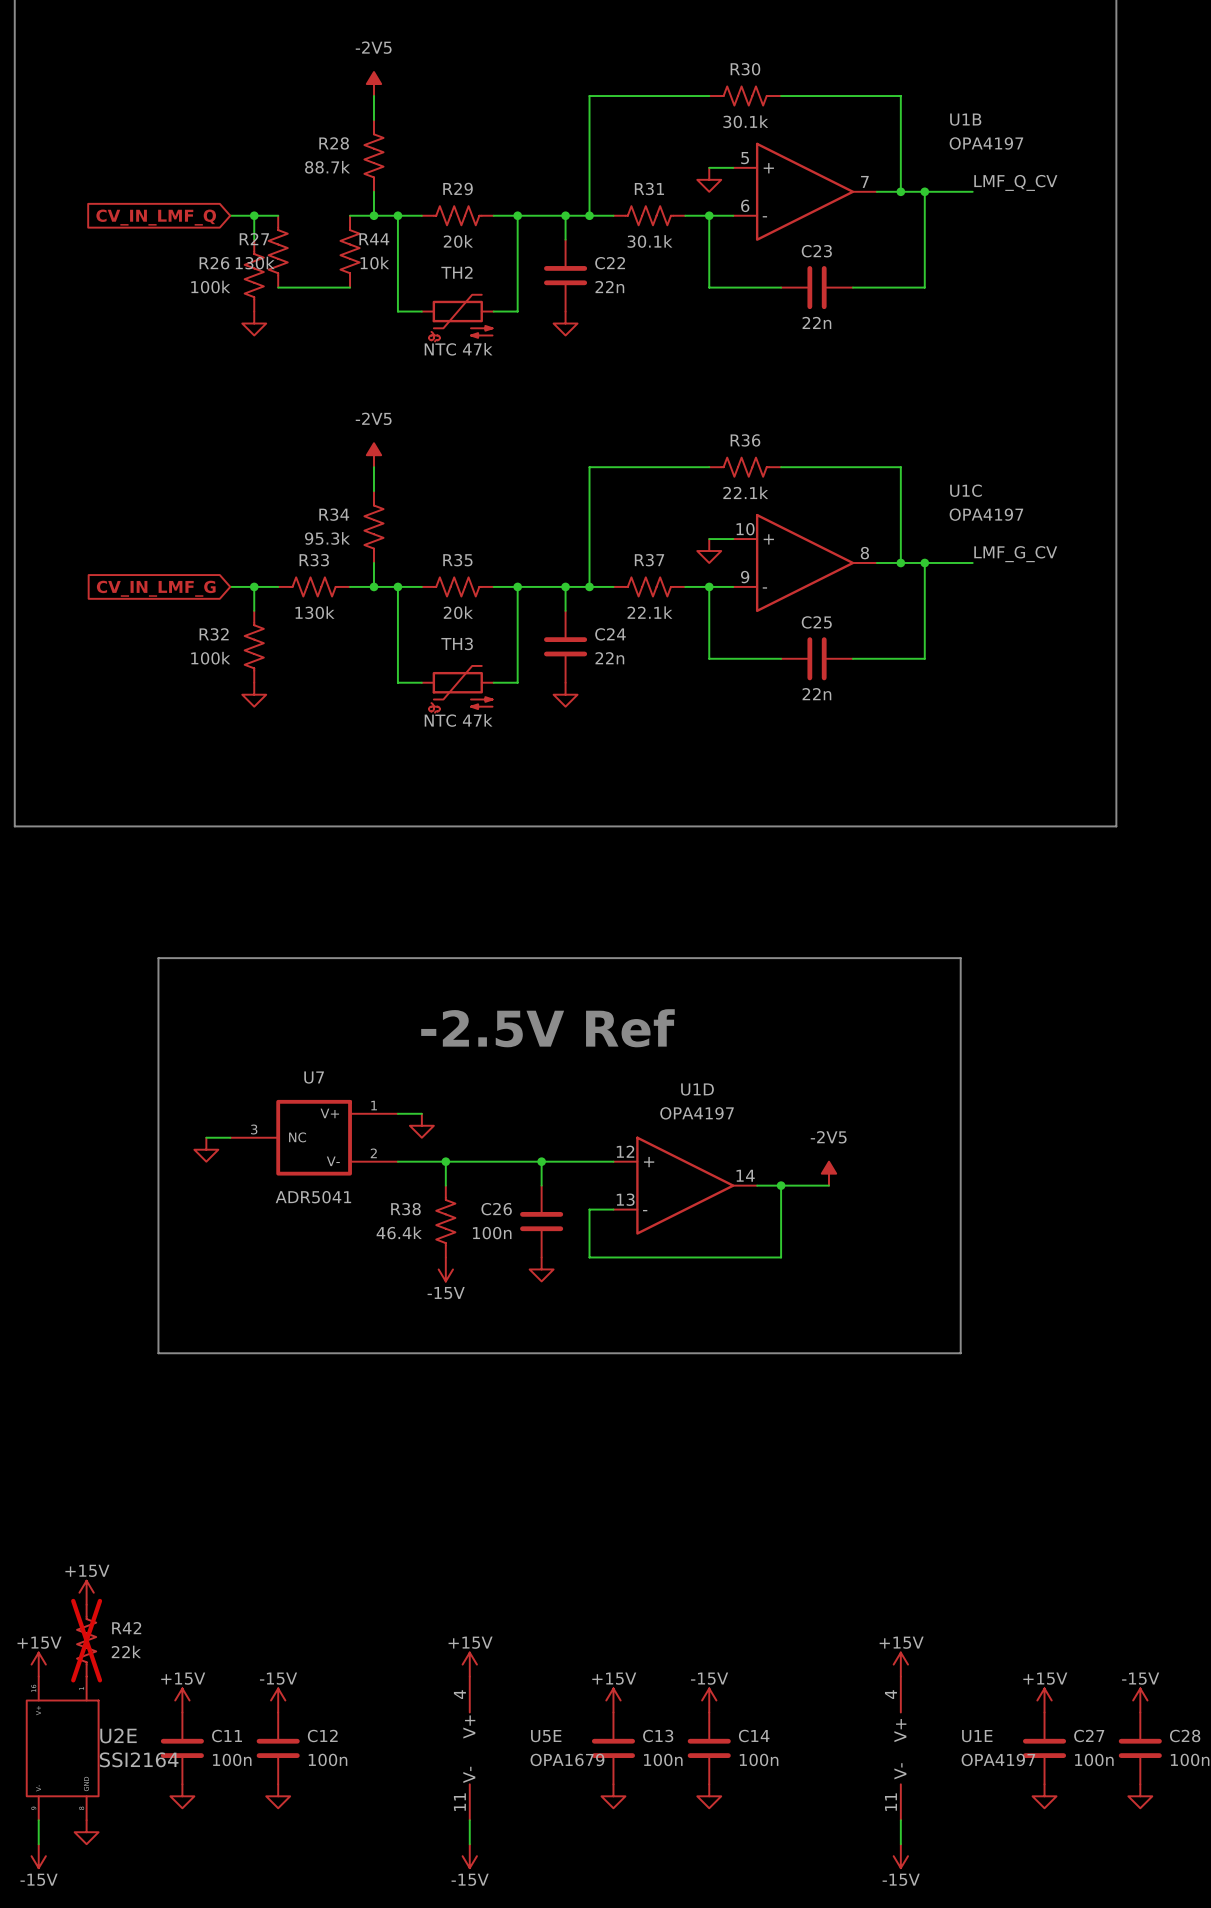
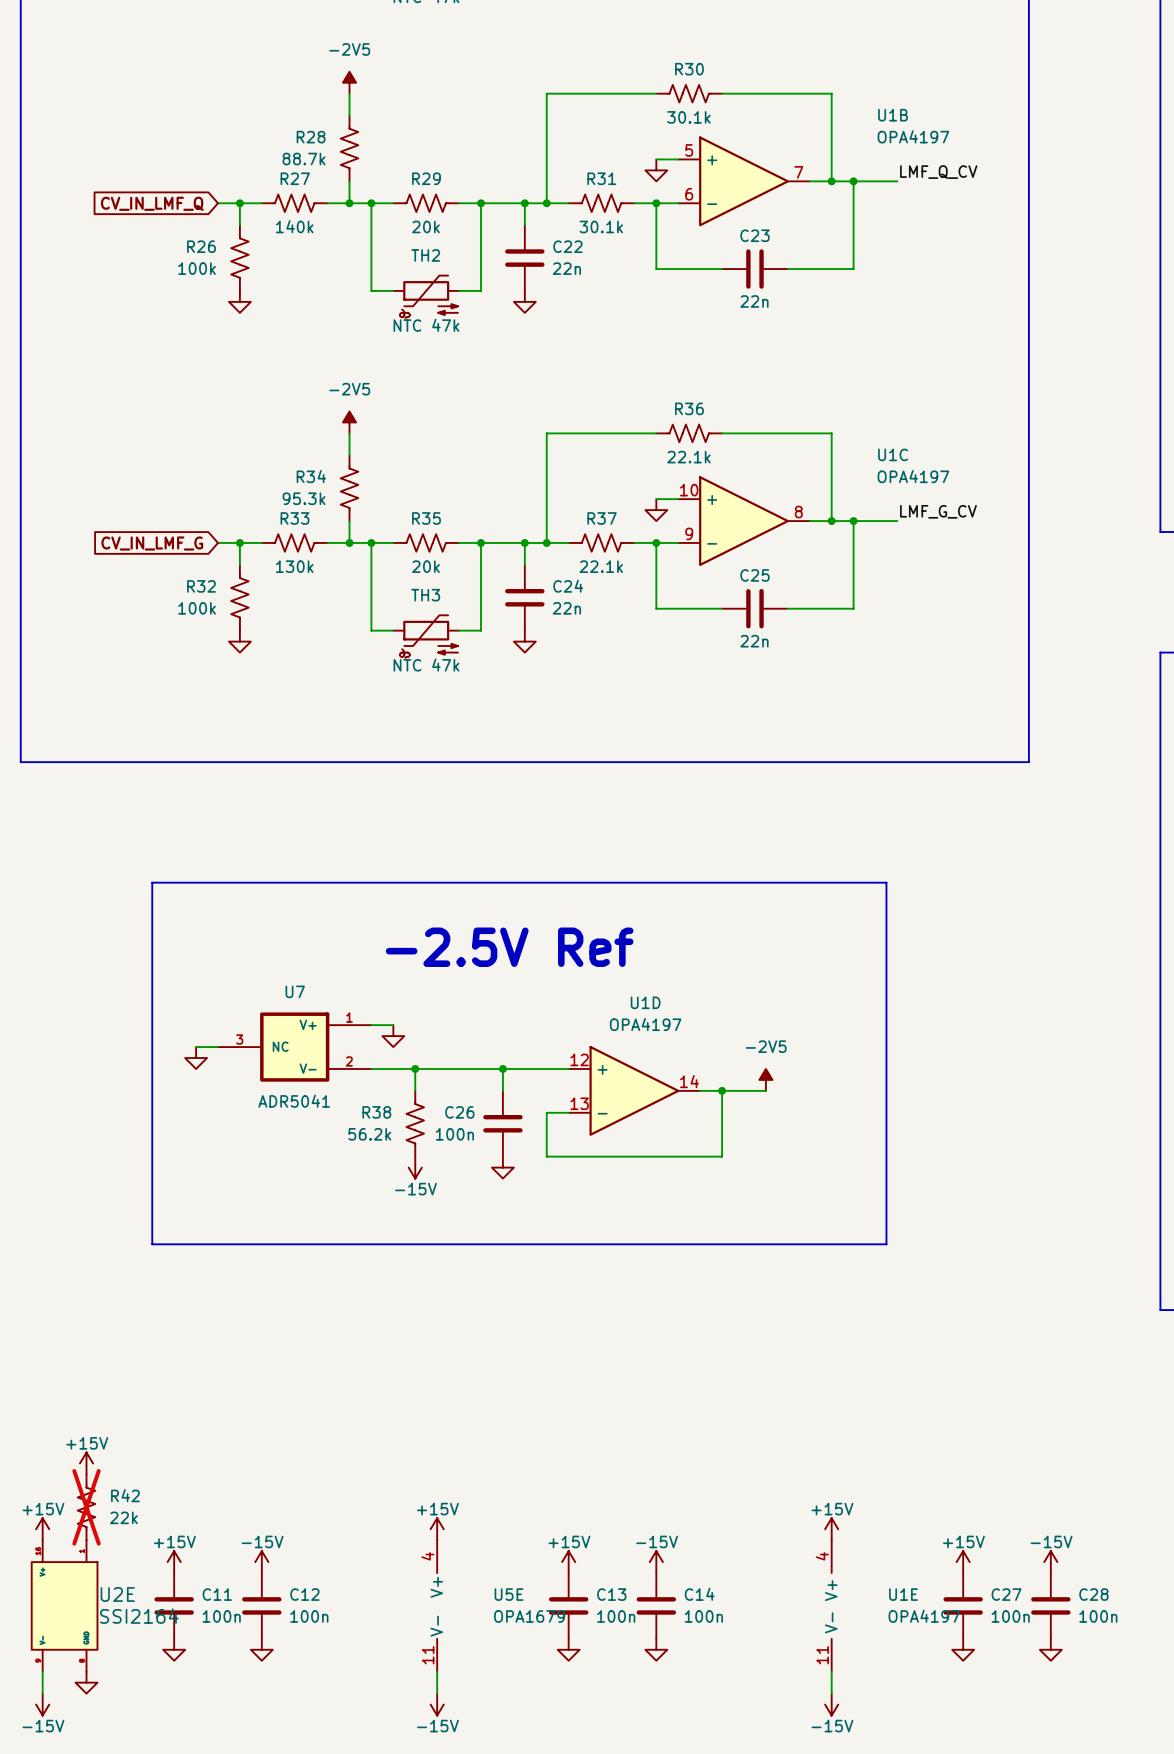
R27 rotation: 0° (278, 251) -> 90° clockwise (294, 203)
R27 position: (278, 251) -> (294, 203)
R44: 10k (350, 251) -> none
R27 value: 130k (255, 263) -> 140k (294, 226)
wire: (278, 287) (350, 287) -> none
R38 value: 46.4k (399, 1232) -> 56.2k (369, 1134)

